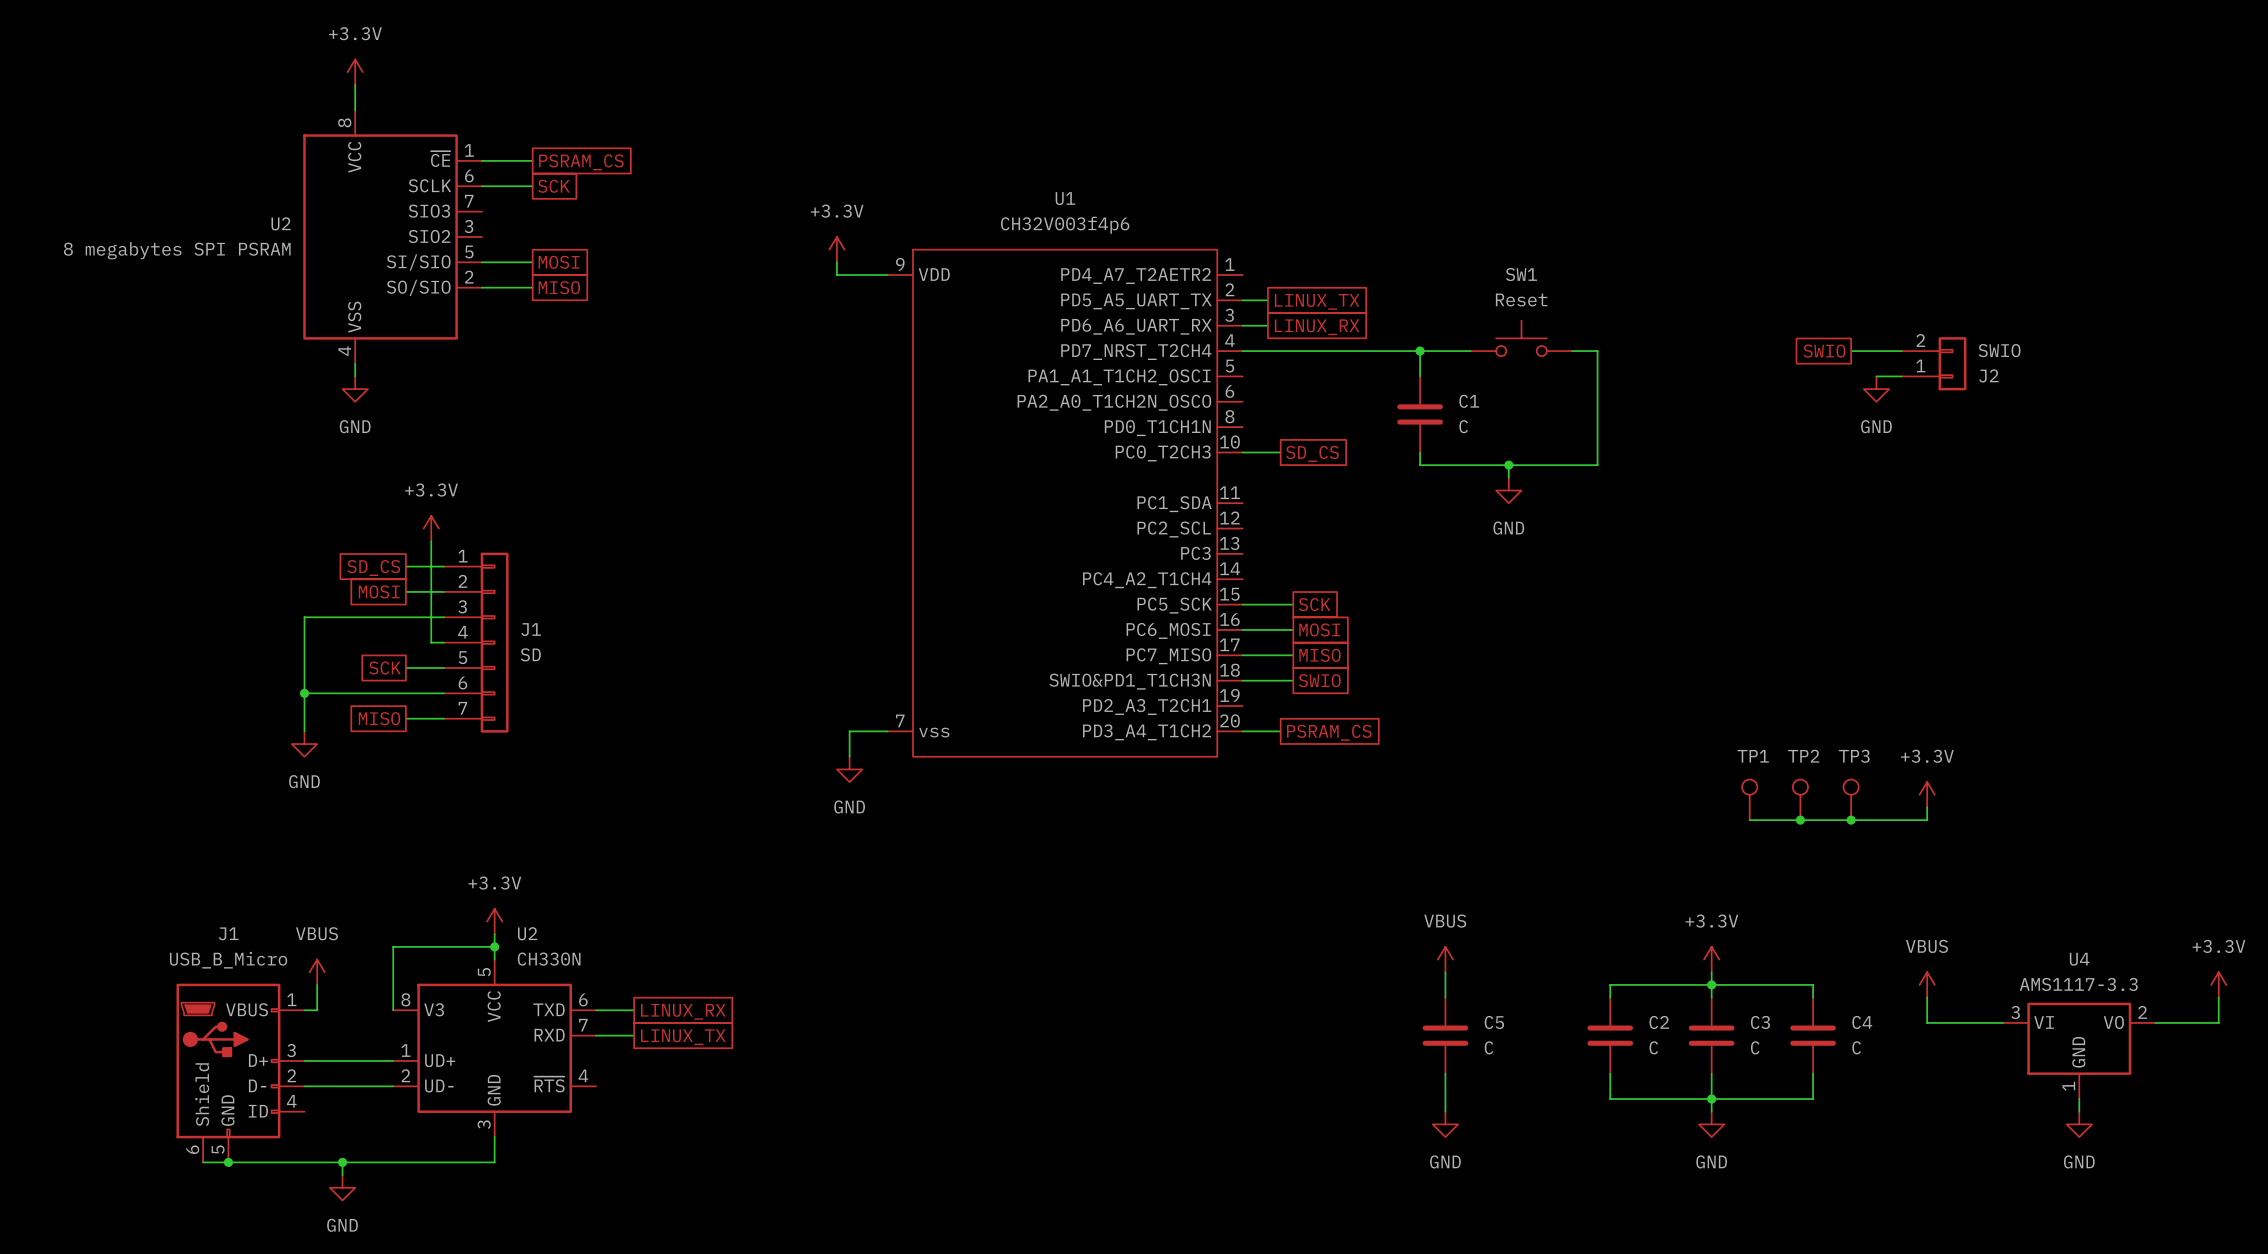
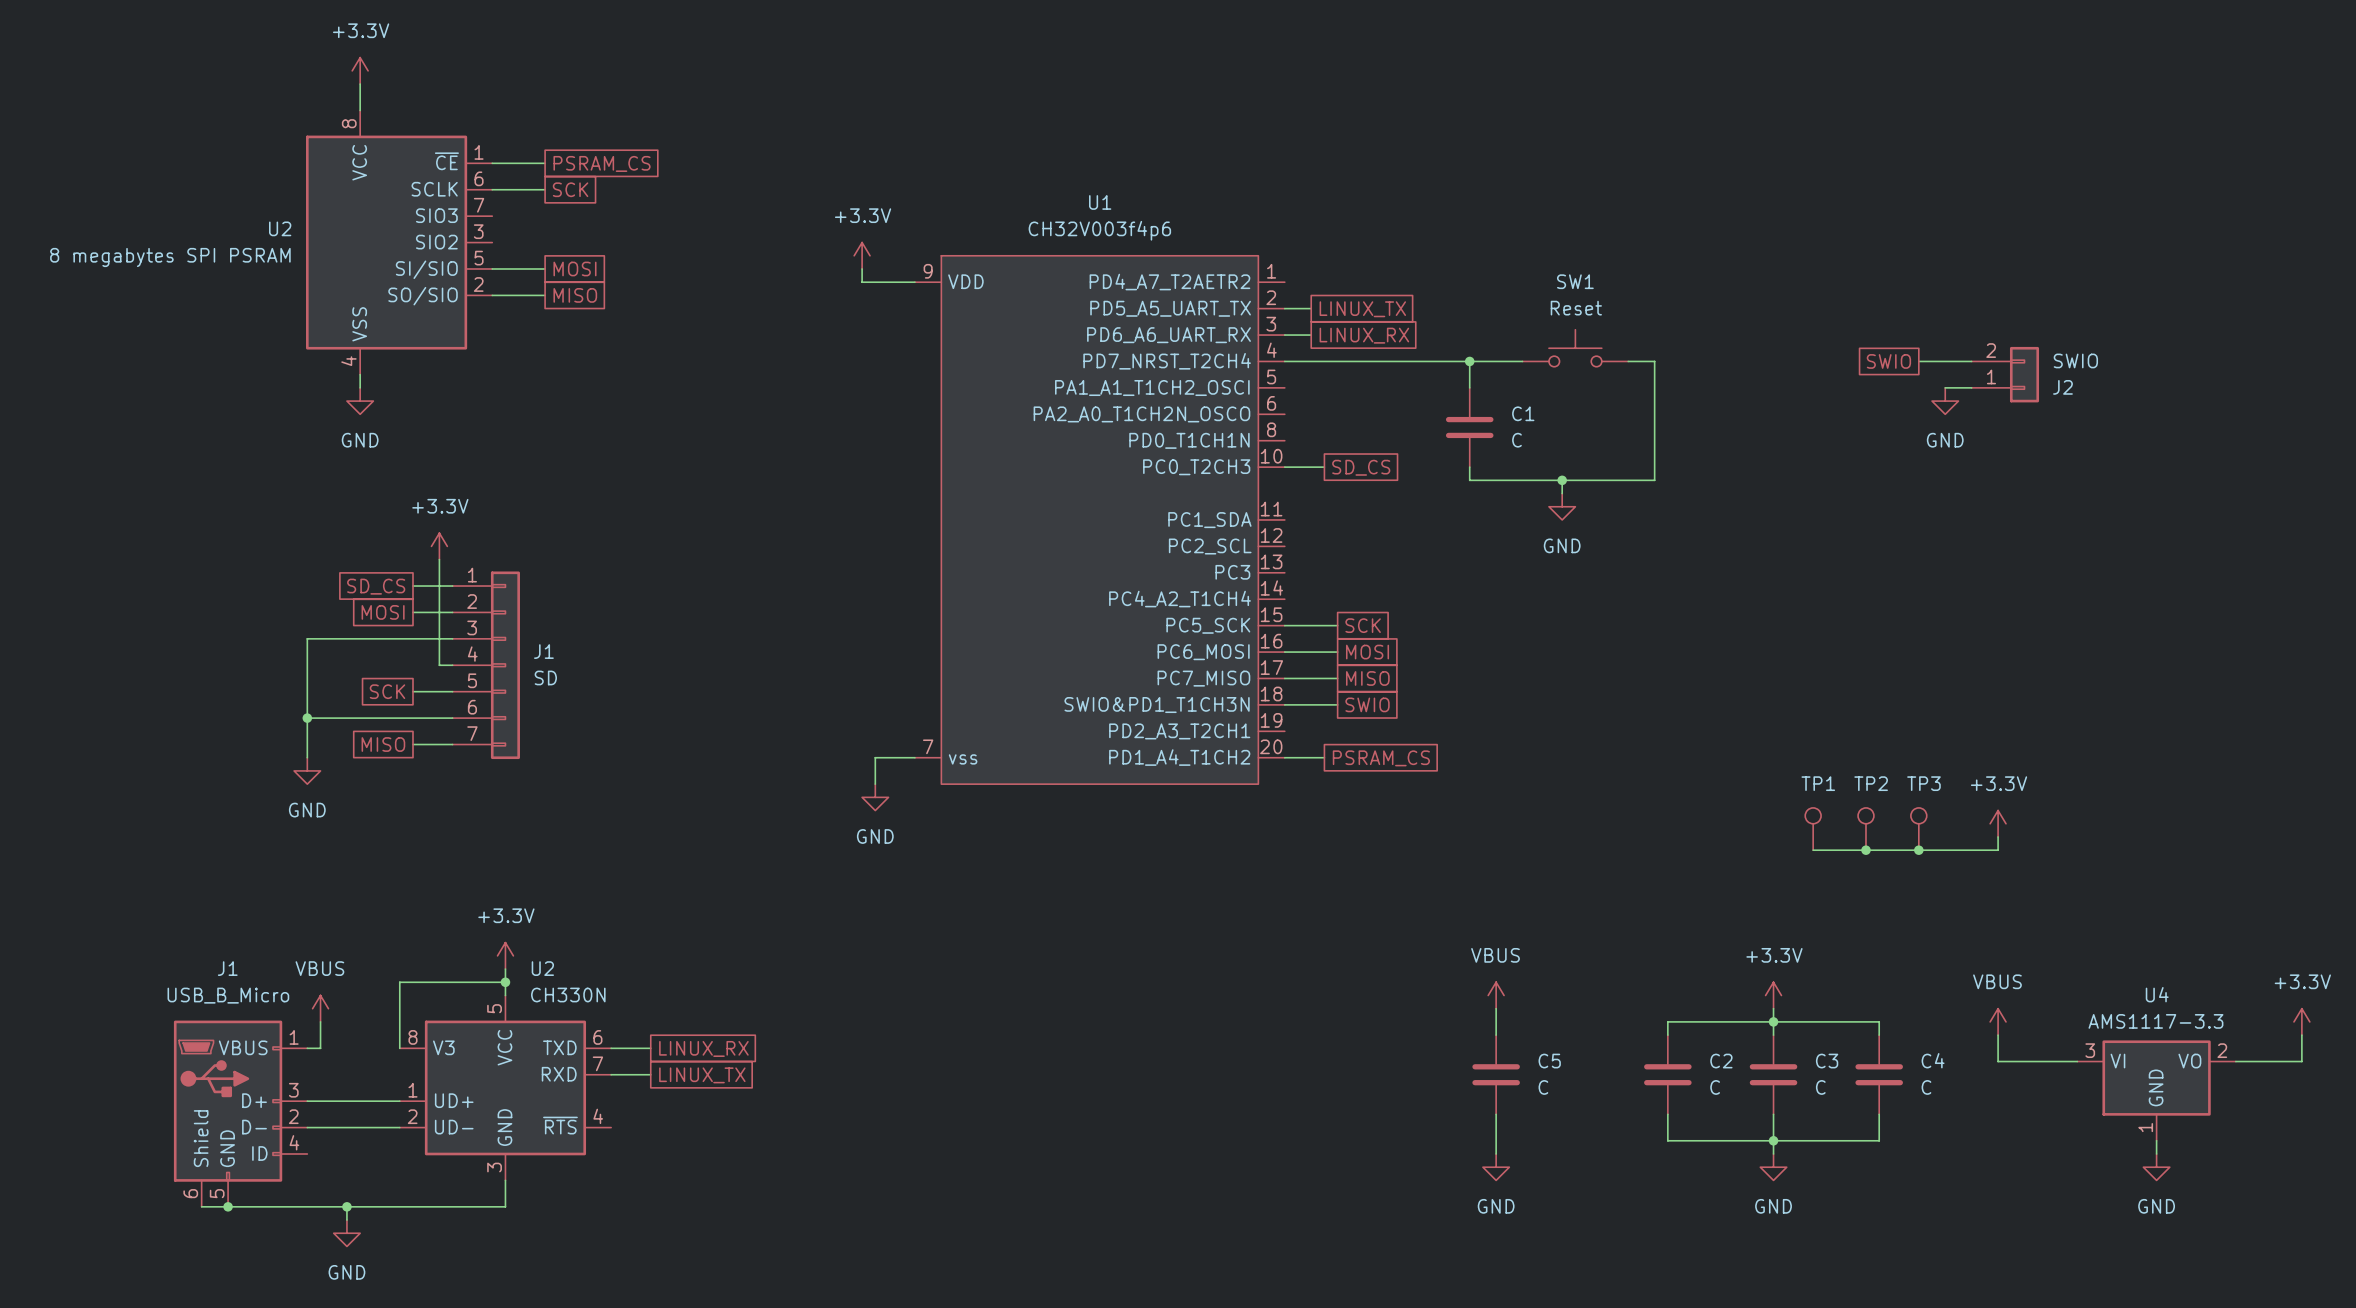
U1 pin name: PD3_A4_T1CH2 (1147, 732) -> PD1_A4_T1CH2 (1179, 757)

